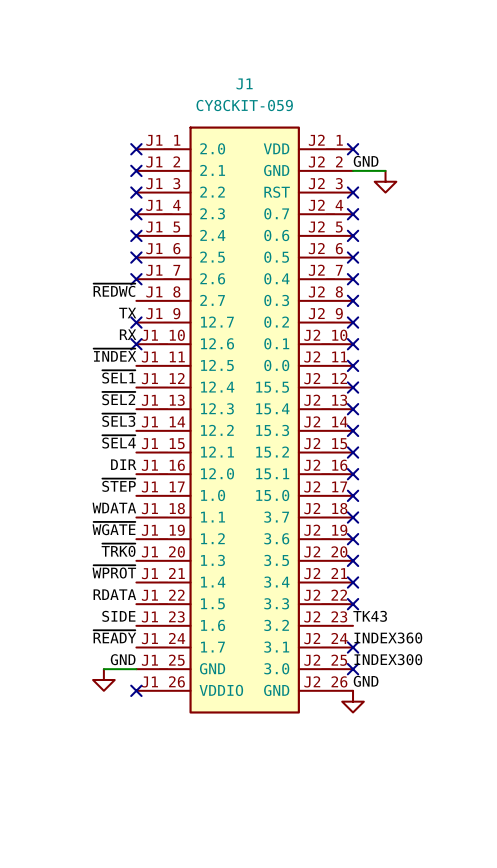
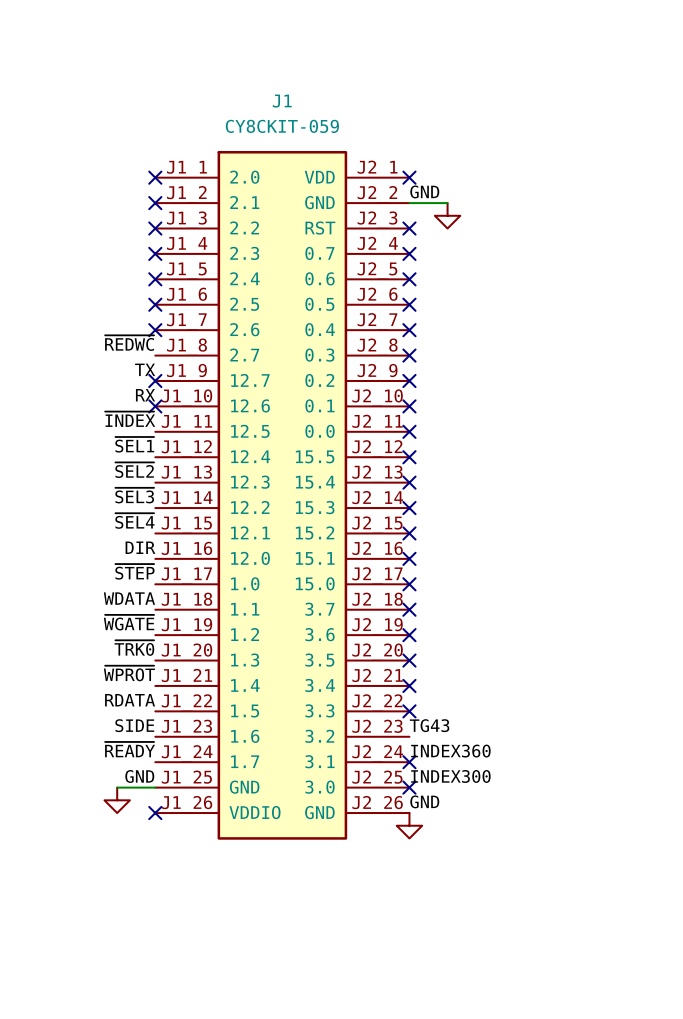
label: TK43 (370, 616) -> TG43 (429, 725)

